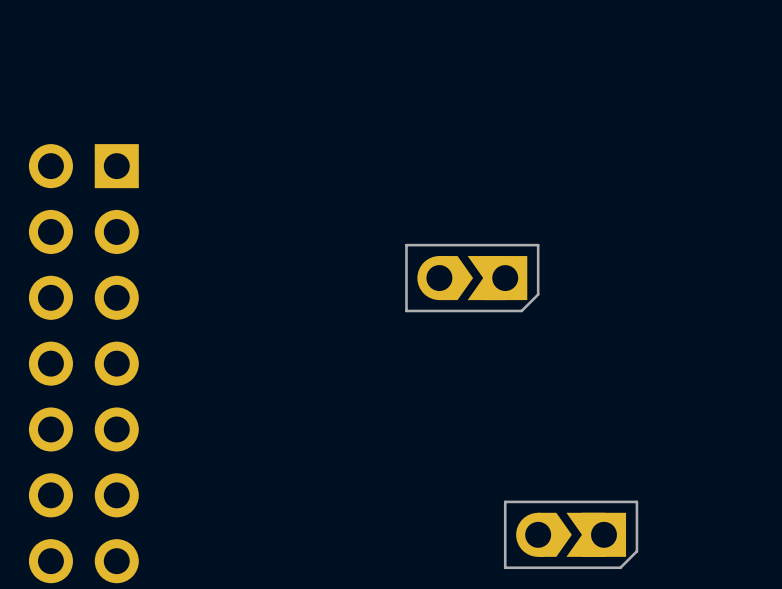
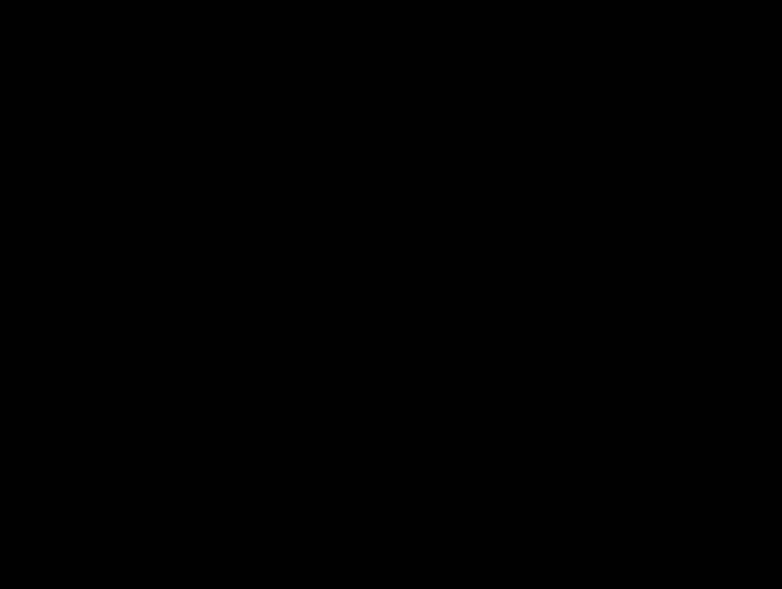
part: (472, 278) -> none
part: (83, 363) -> none
part: (571, 534) -> none

